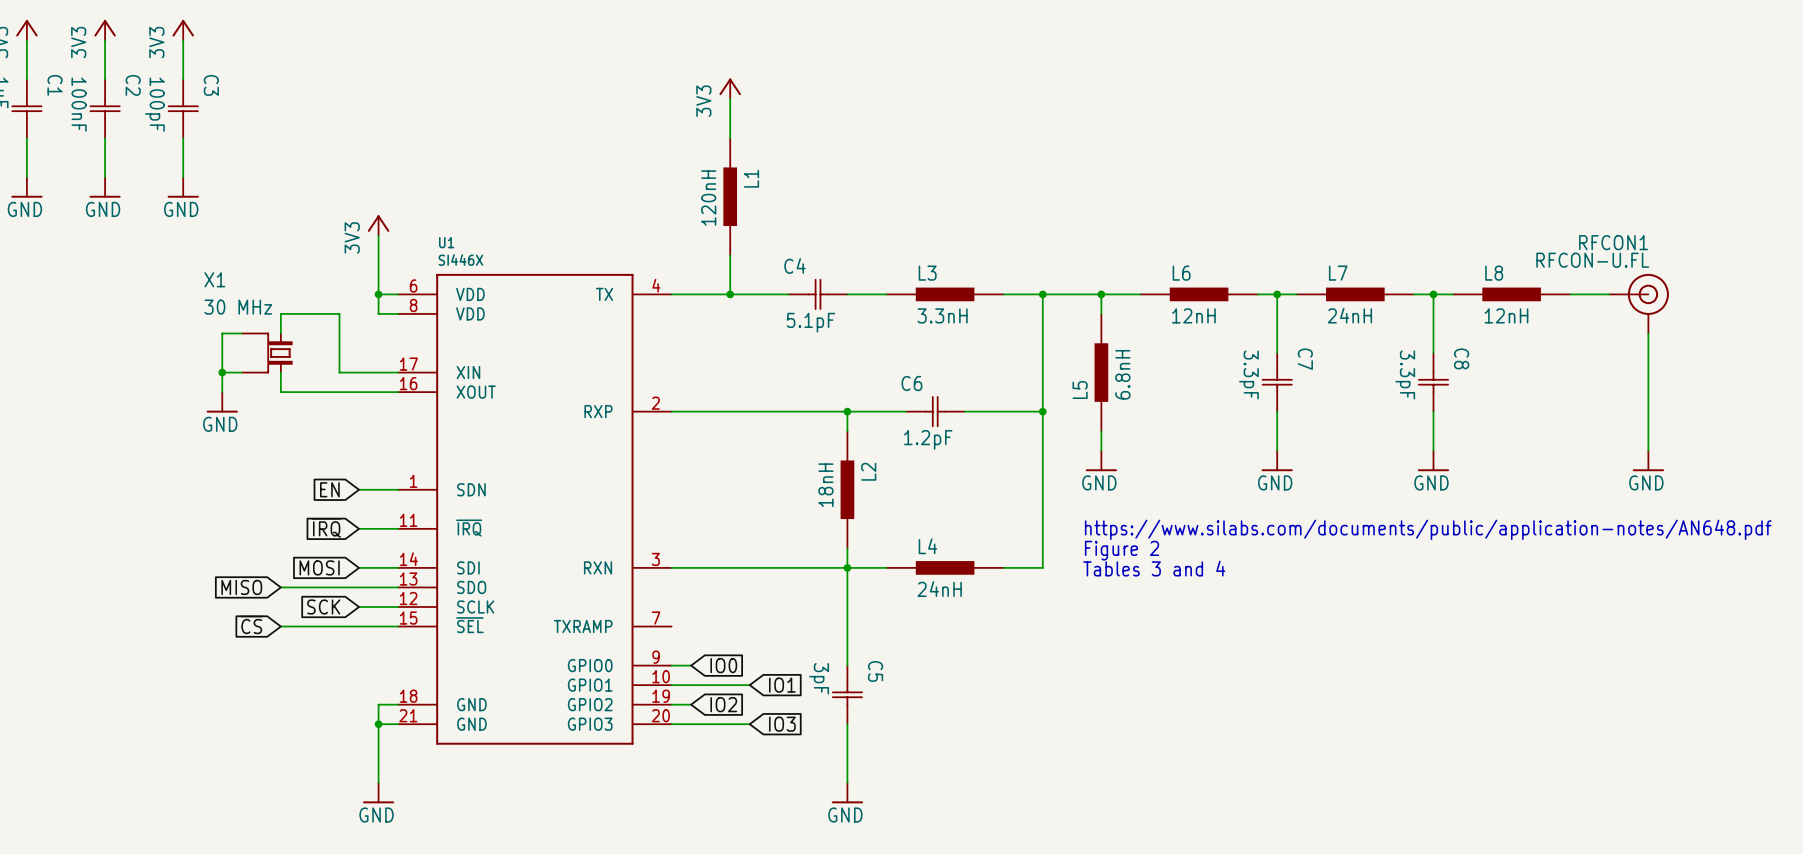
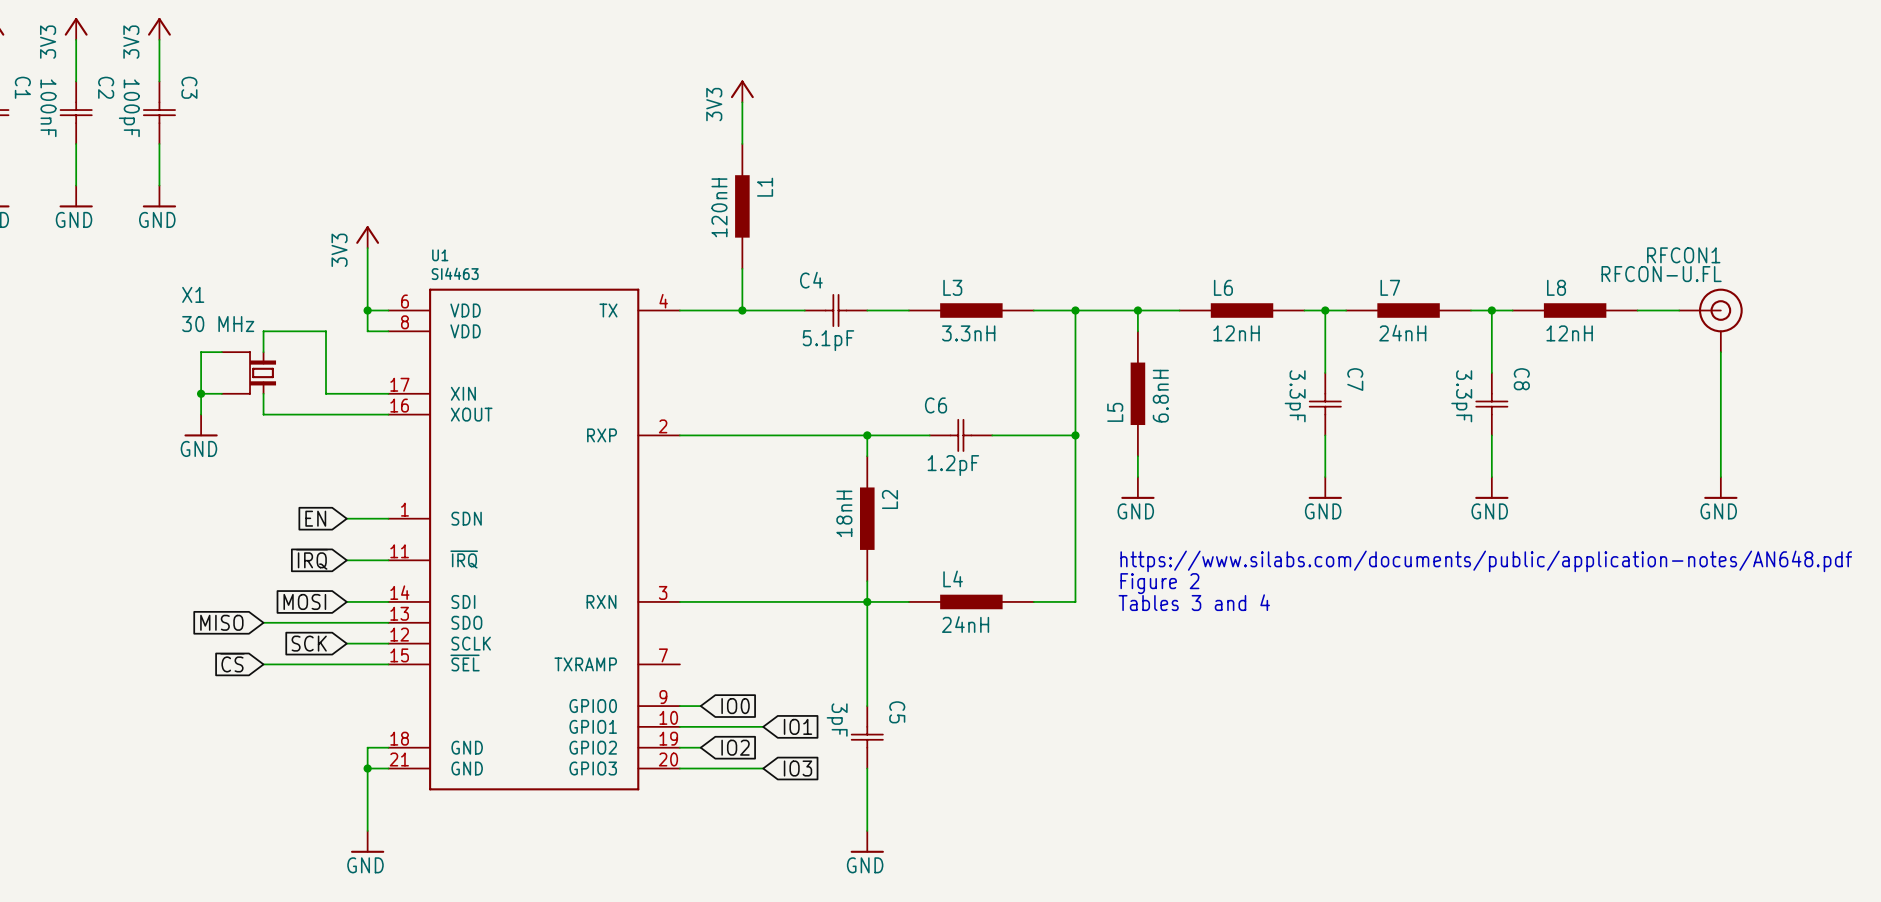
U1 value: SI446X (460, 260) -> SI4463 (455, 273)

